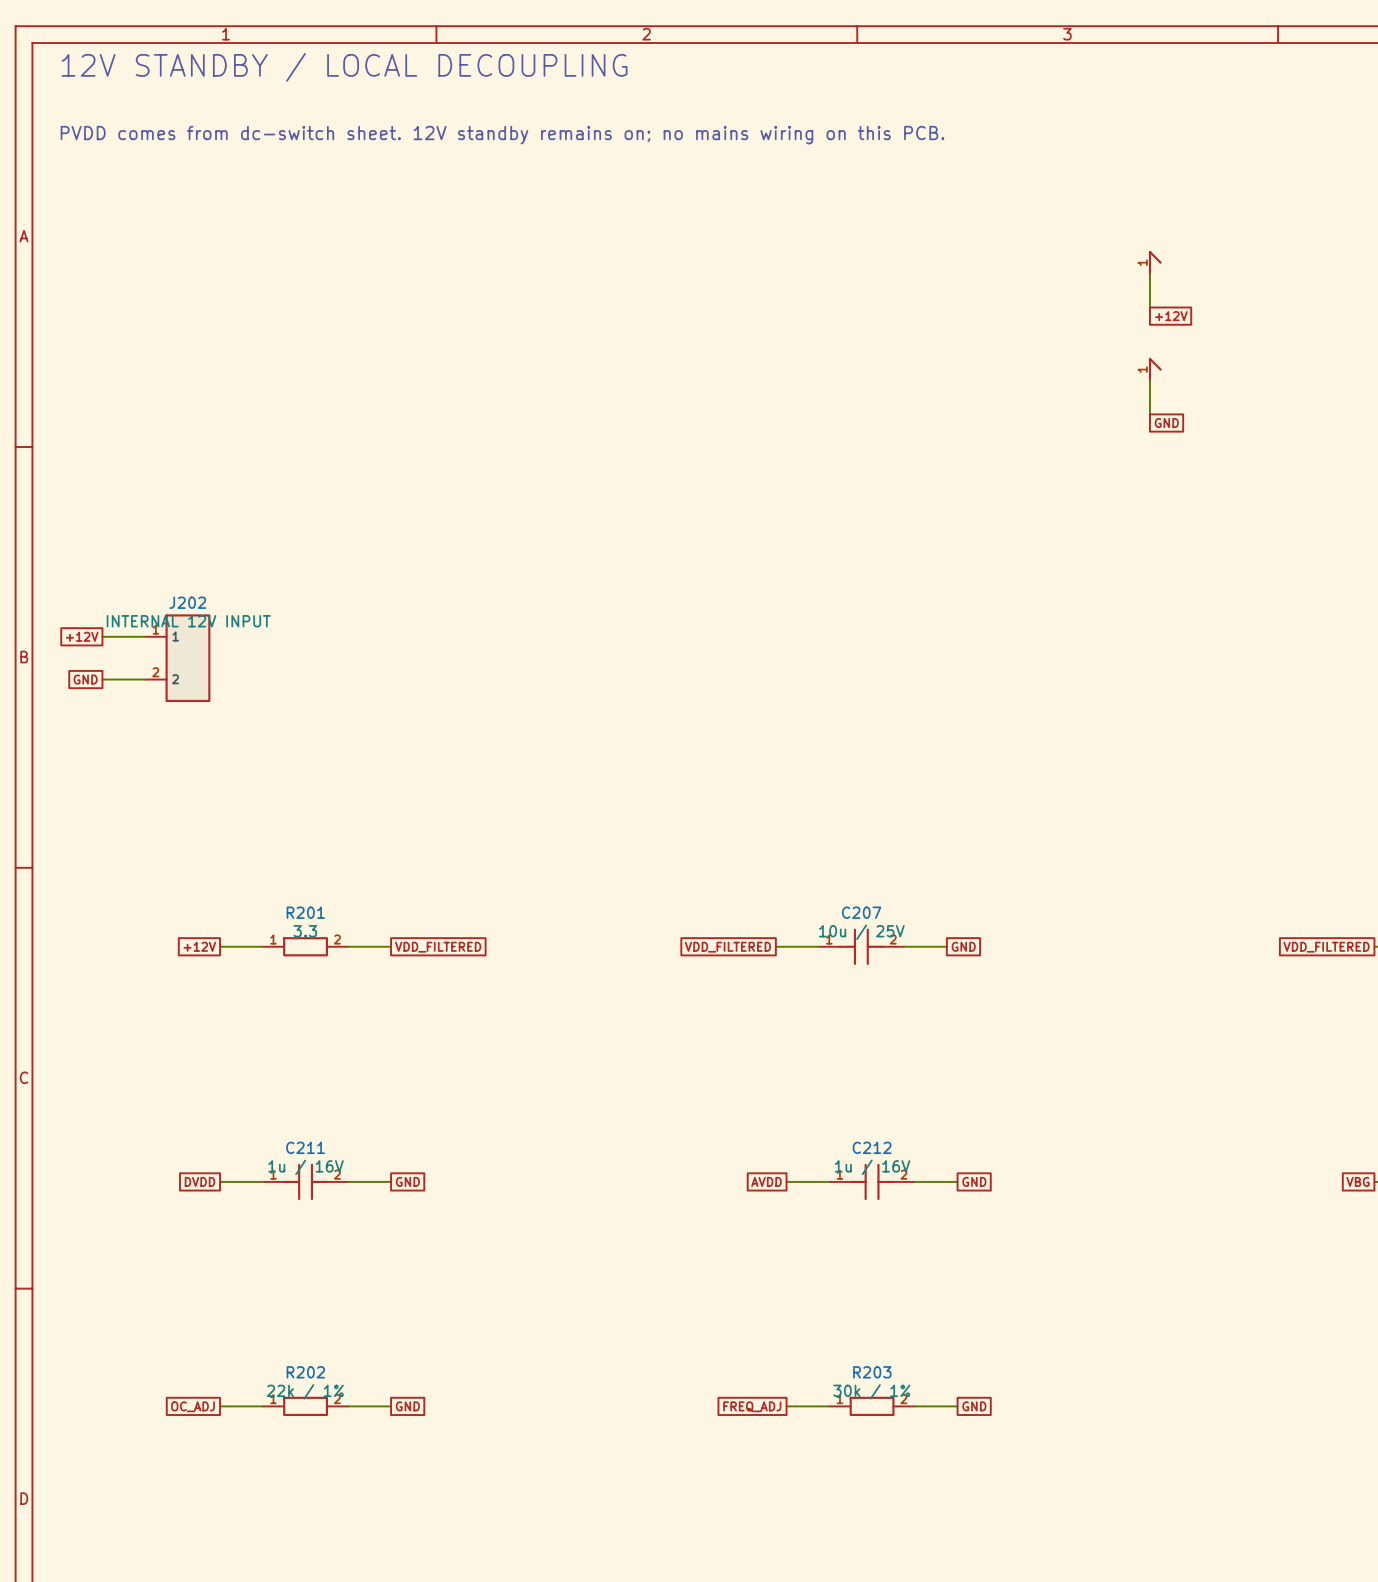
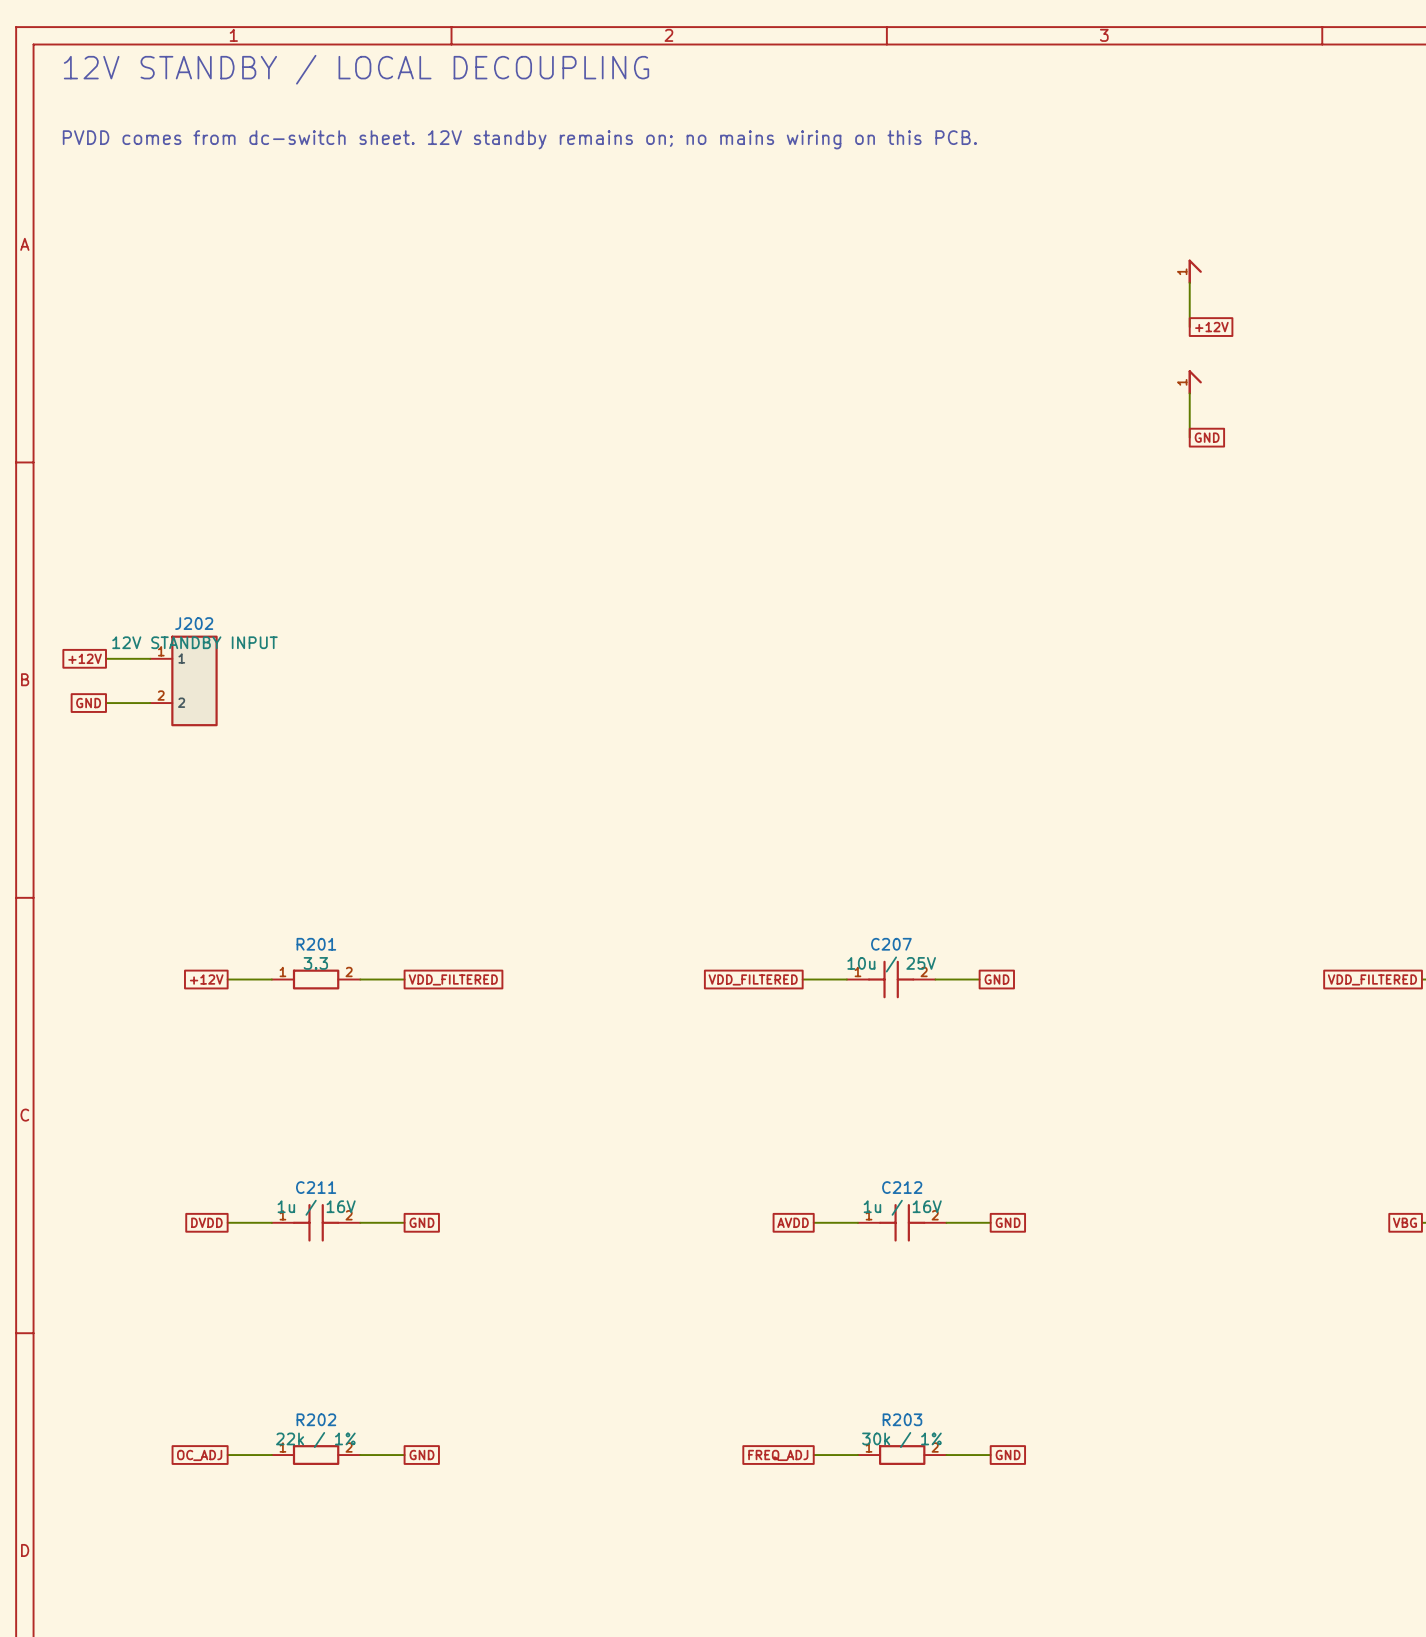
J202 value: INTERNAL 12V INPUT (188, 621) -> 12V STANDBY INPUT (194, 642)

